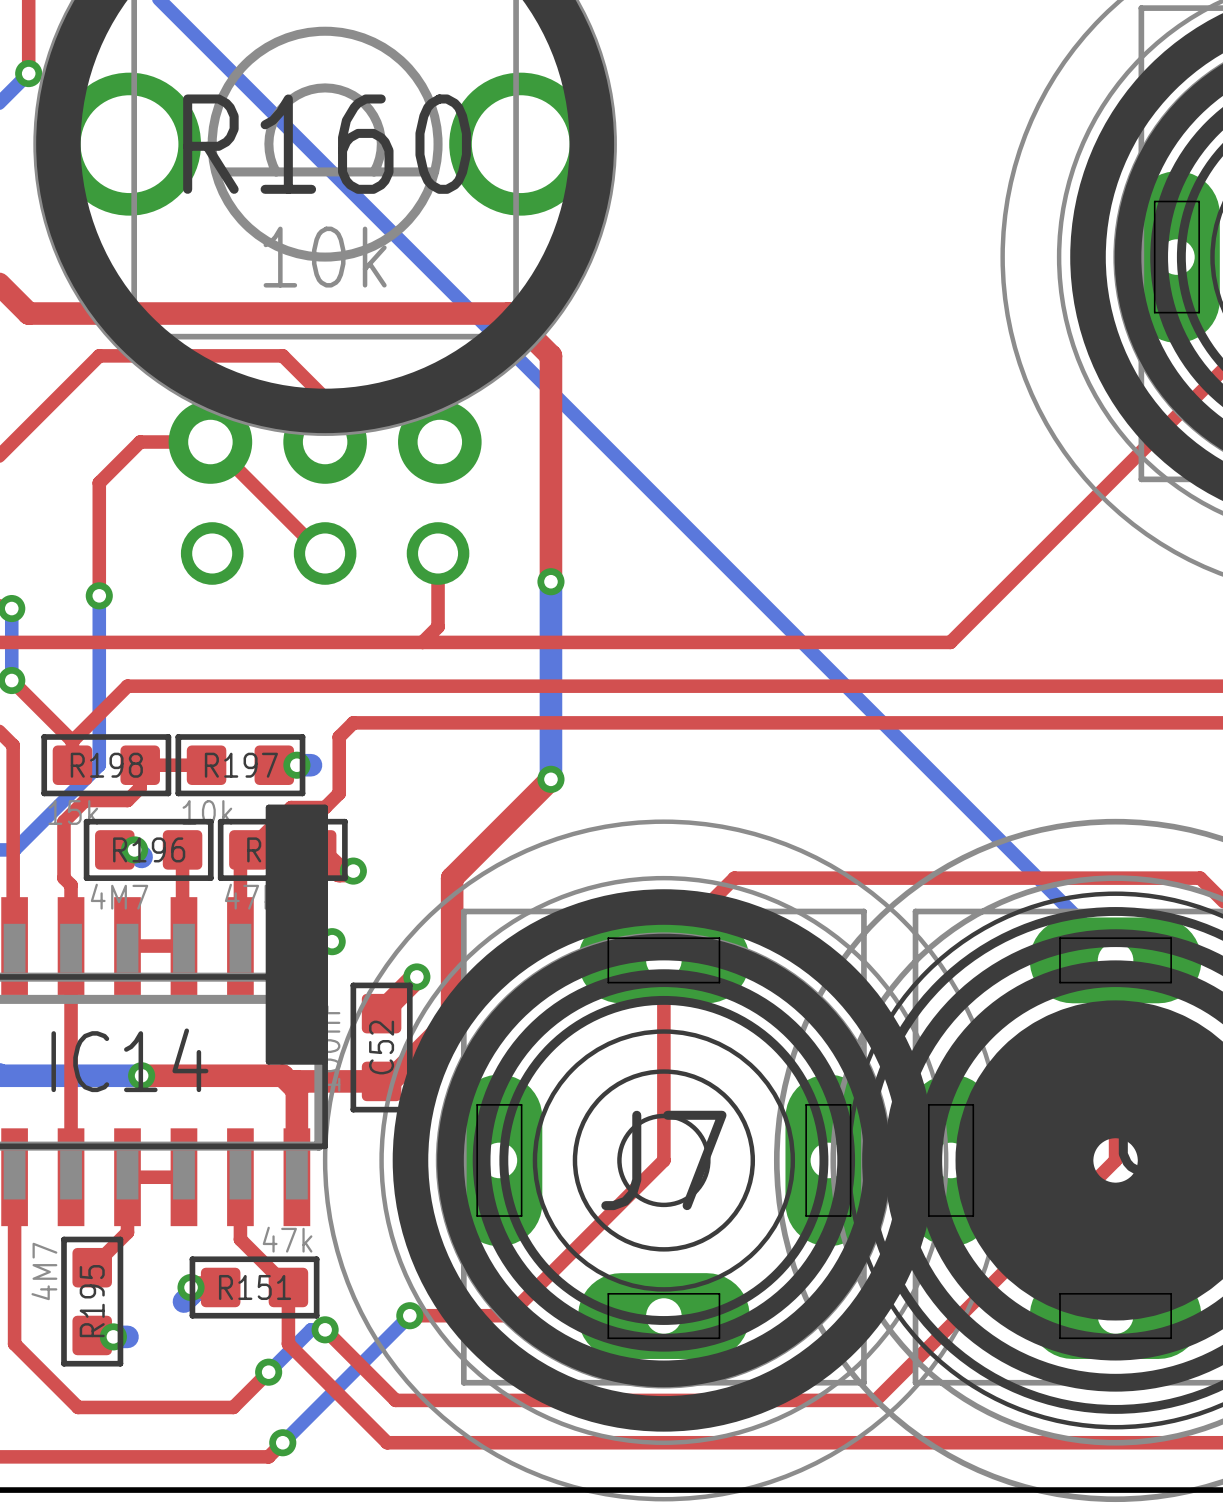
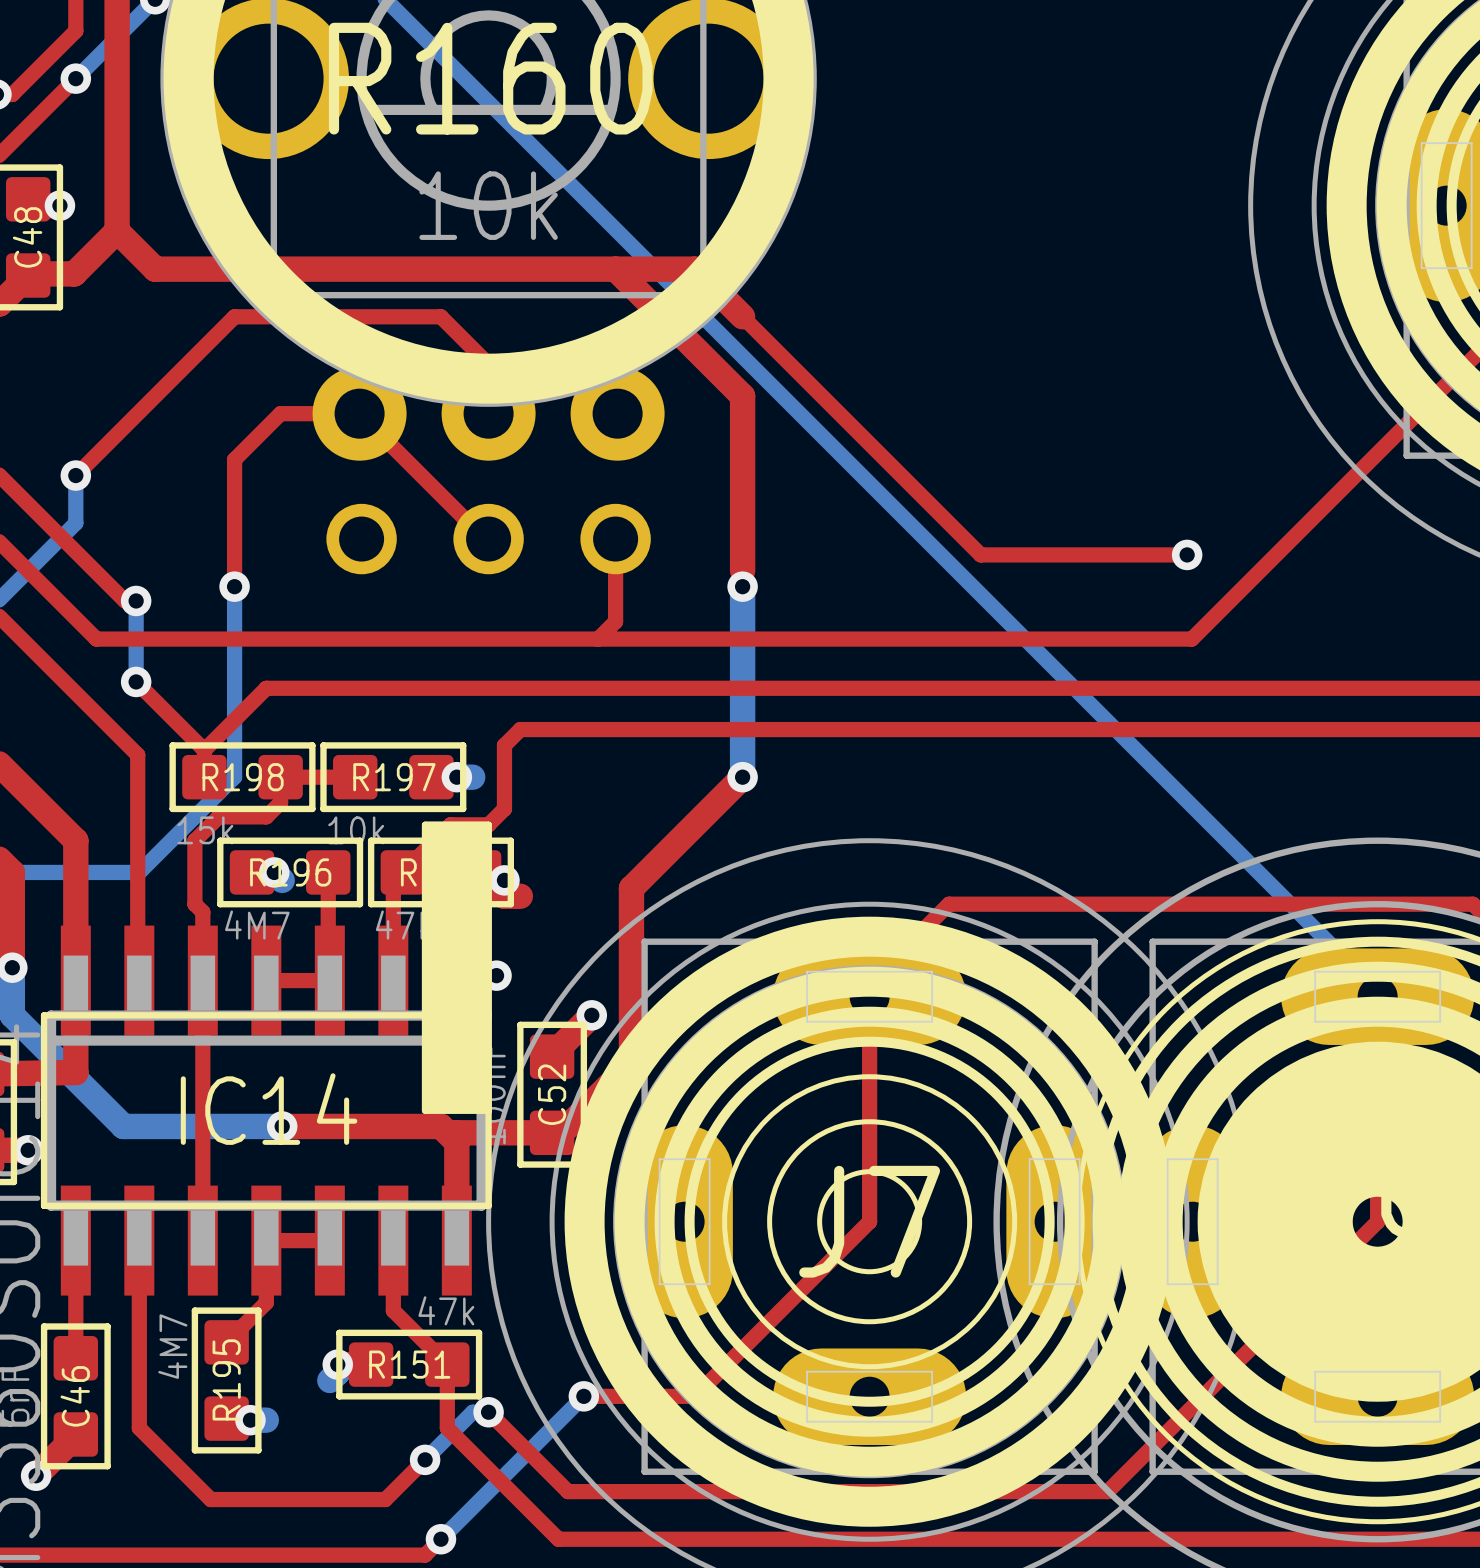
top track: (550, 355) (550, 426) -> (615, 269) (742, 396)
top track: none -> (742, 316) (980, 554) (1187, 554)
via: none -> (1187, 554)
via position: (550, 581) -> (742, 586)
top track: (550, 779) (452, 878) -> (742, 777) (631, 888) (631, 904)
via position: (550, 779) -> (742, 777)
via position: (353, 871) -> (504, 880)

